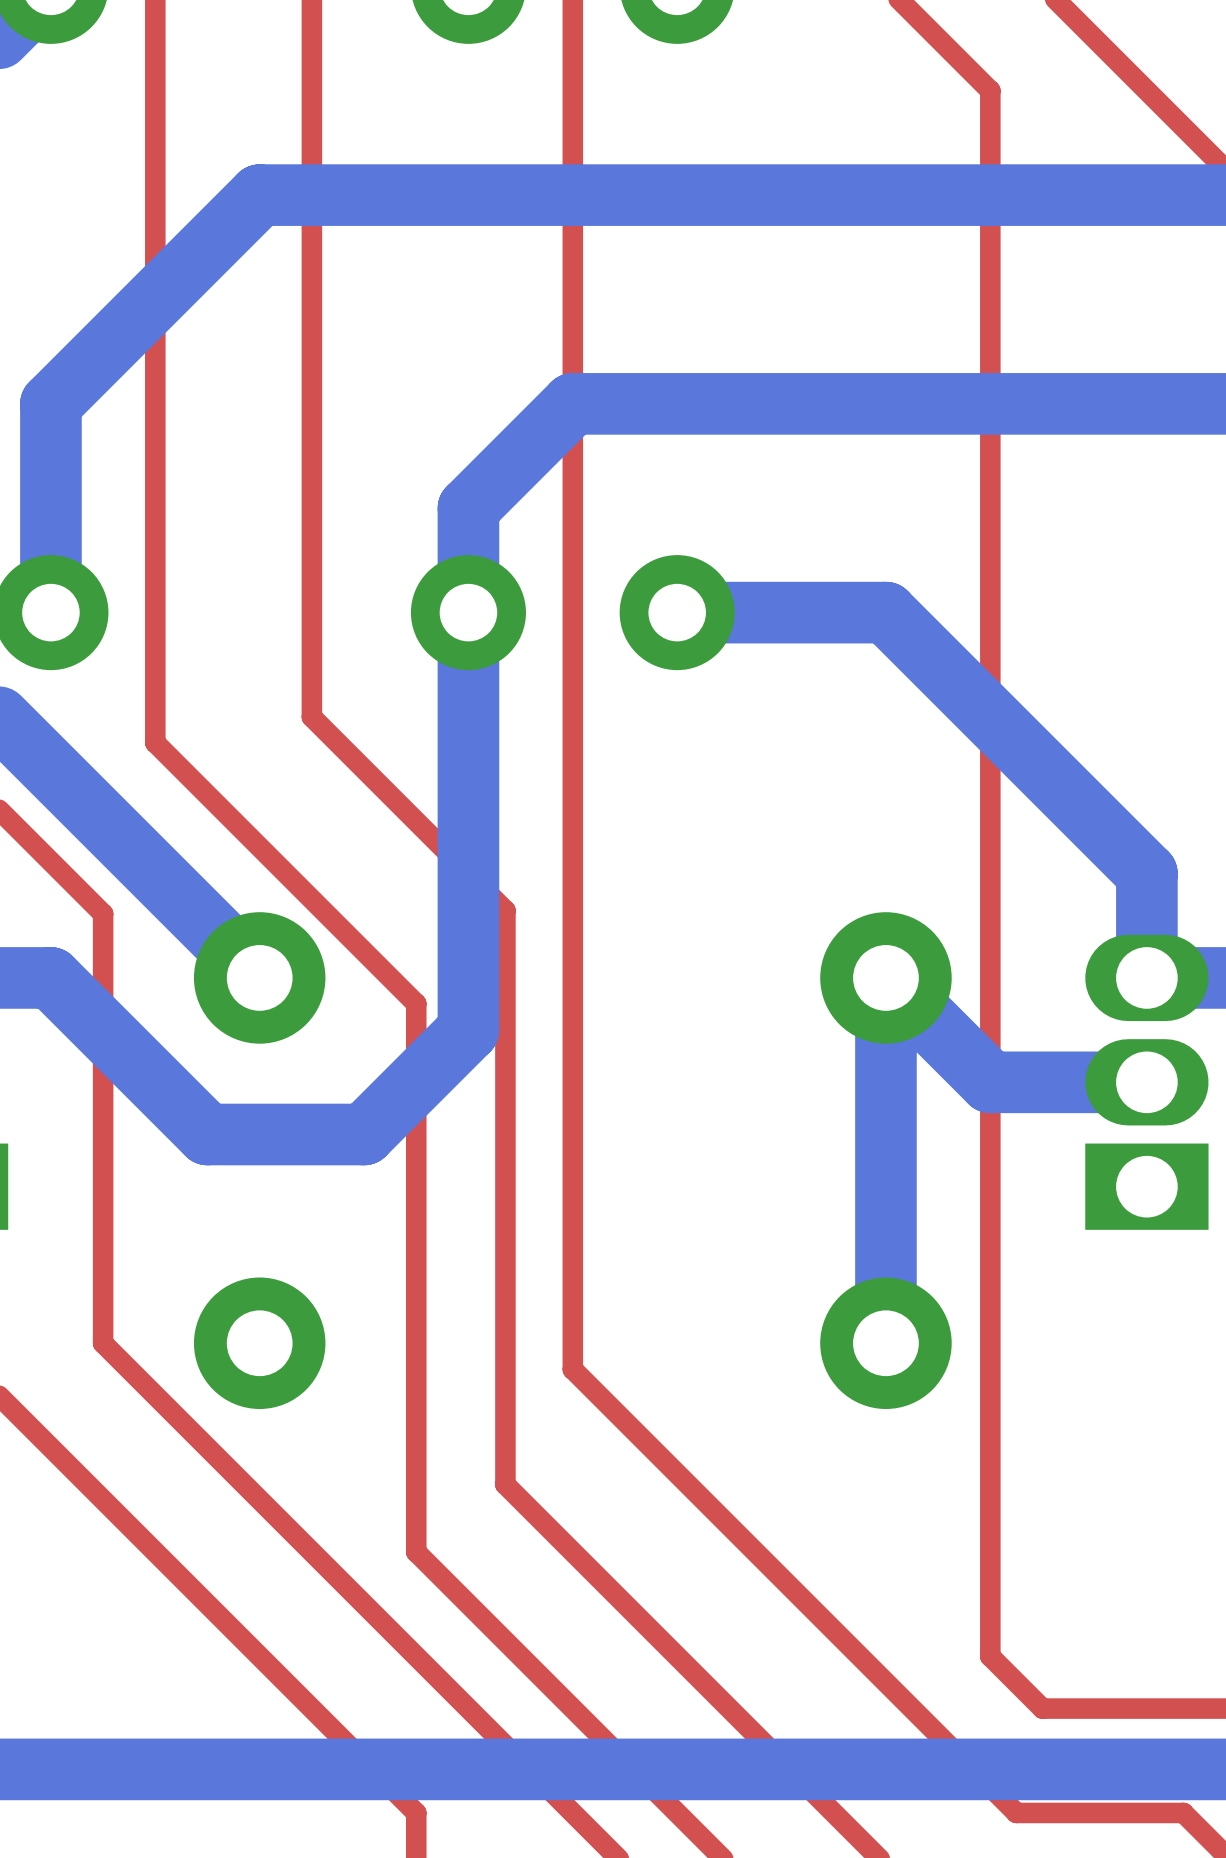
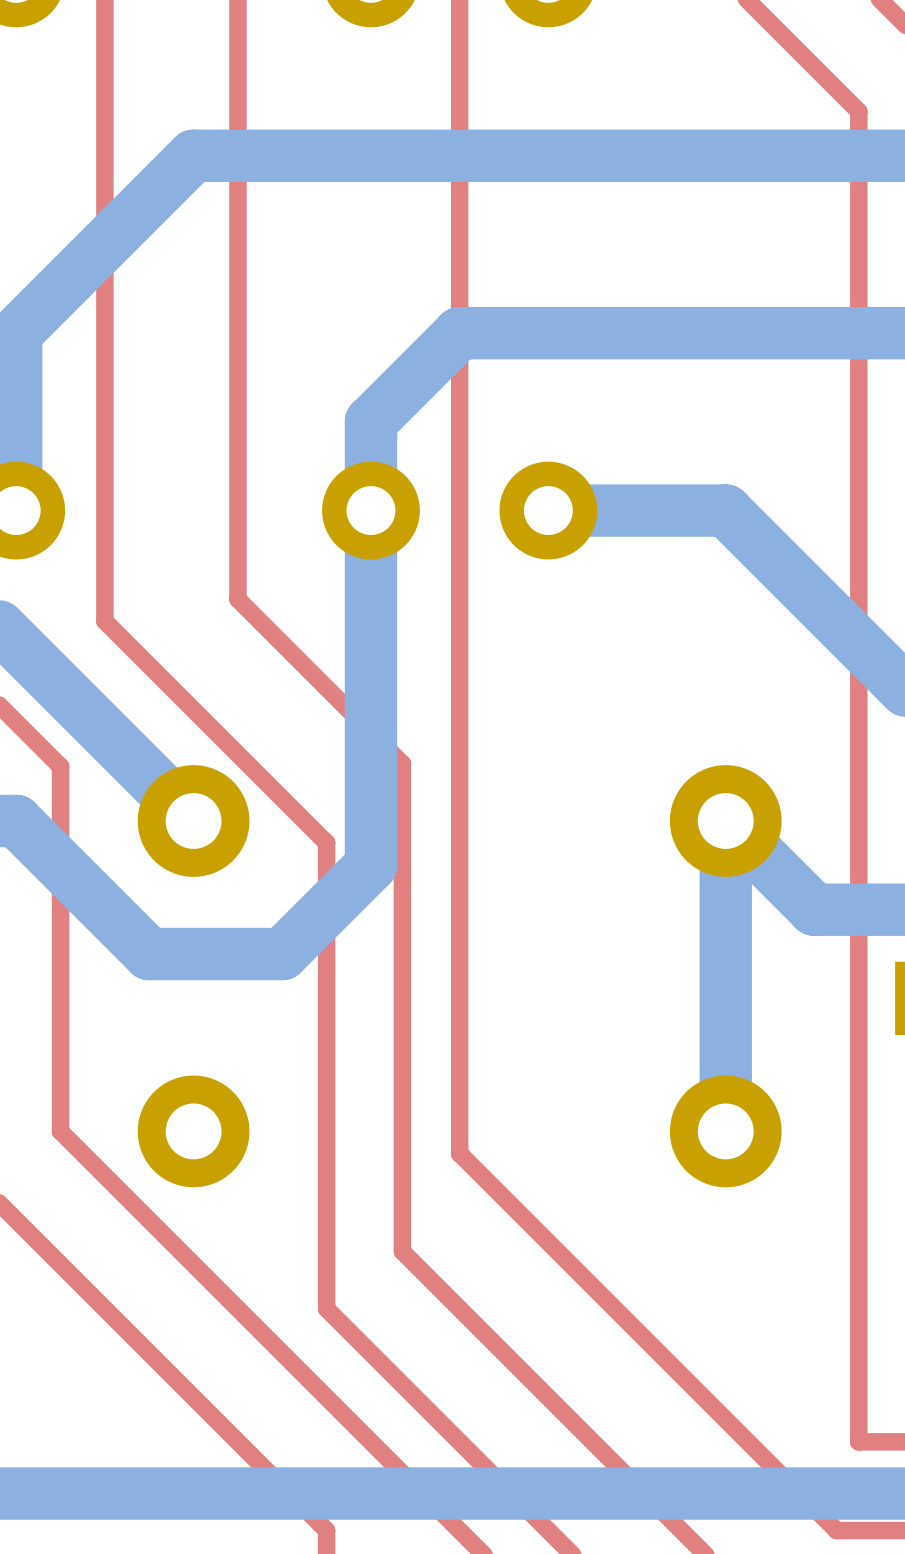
top track: (990, 90) (990, 1656) (1042, 1708) -> (814, 67) (858, 111) (858, 1441)

